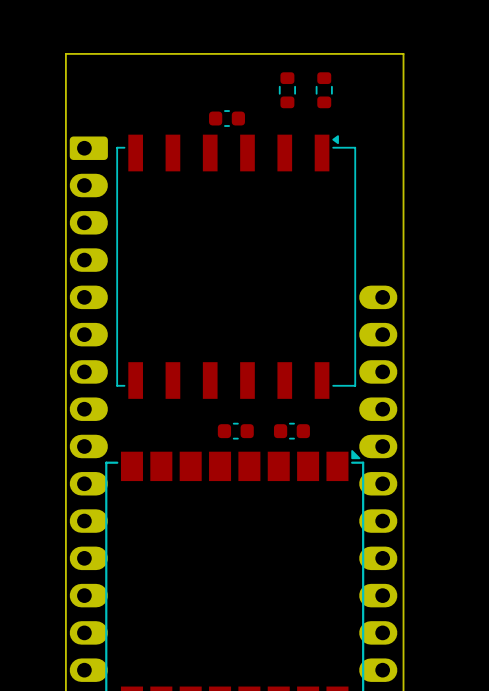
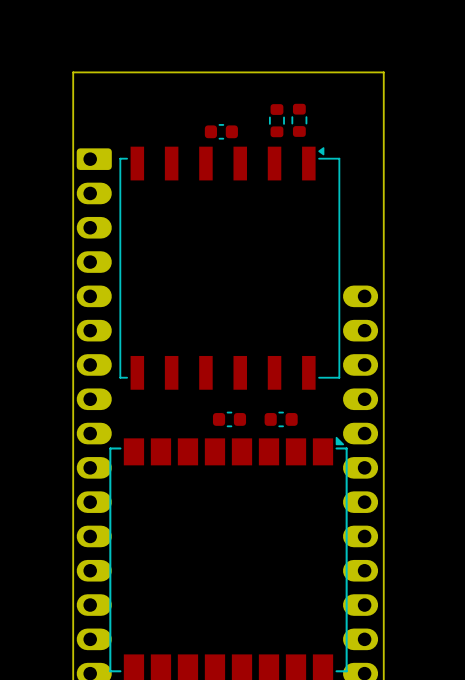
part: (287, 90) -> none
part: (324, 90) -> none
part: none -> (276, 120)
part: none -> (299, 120)

